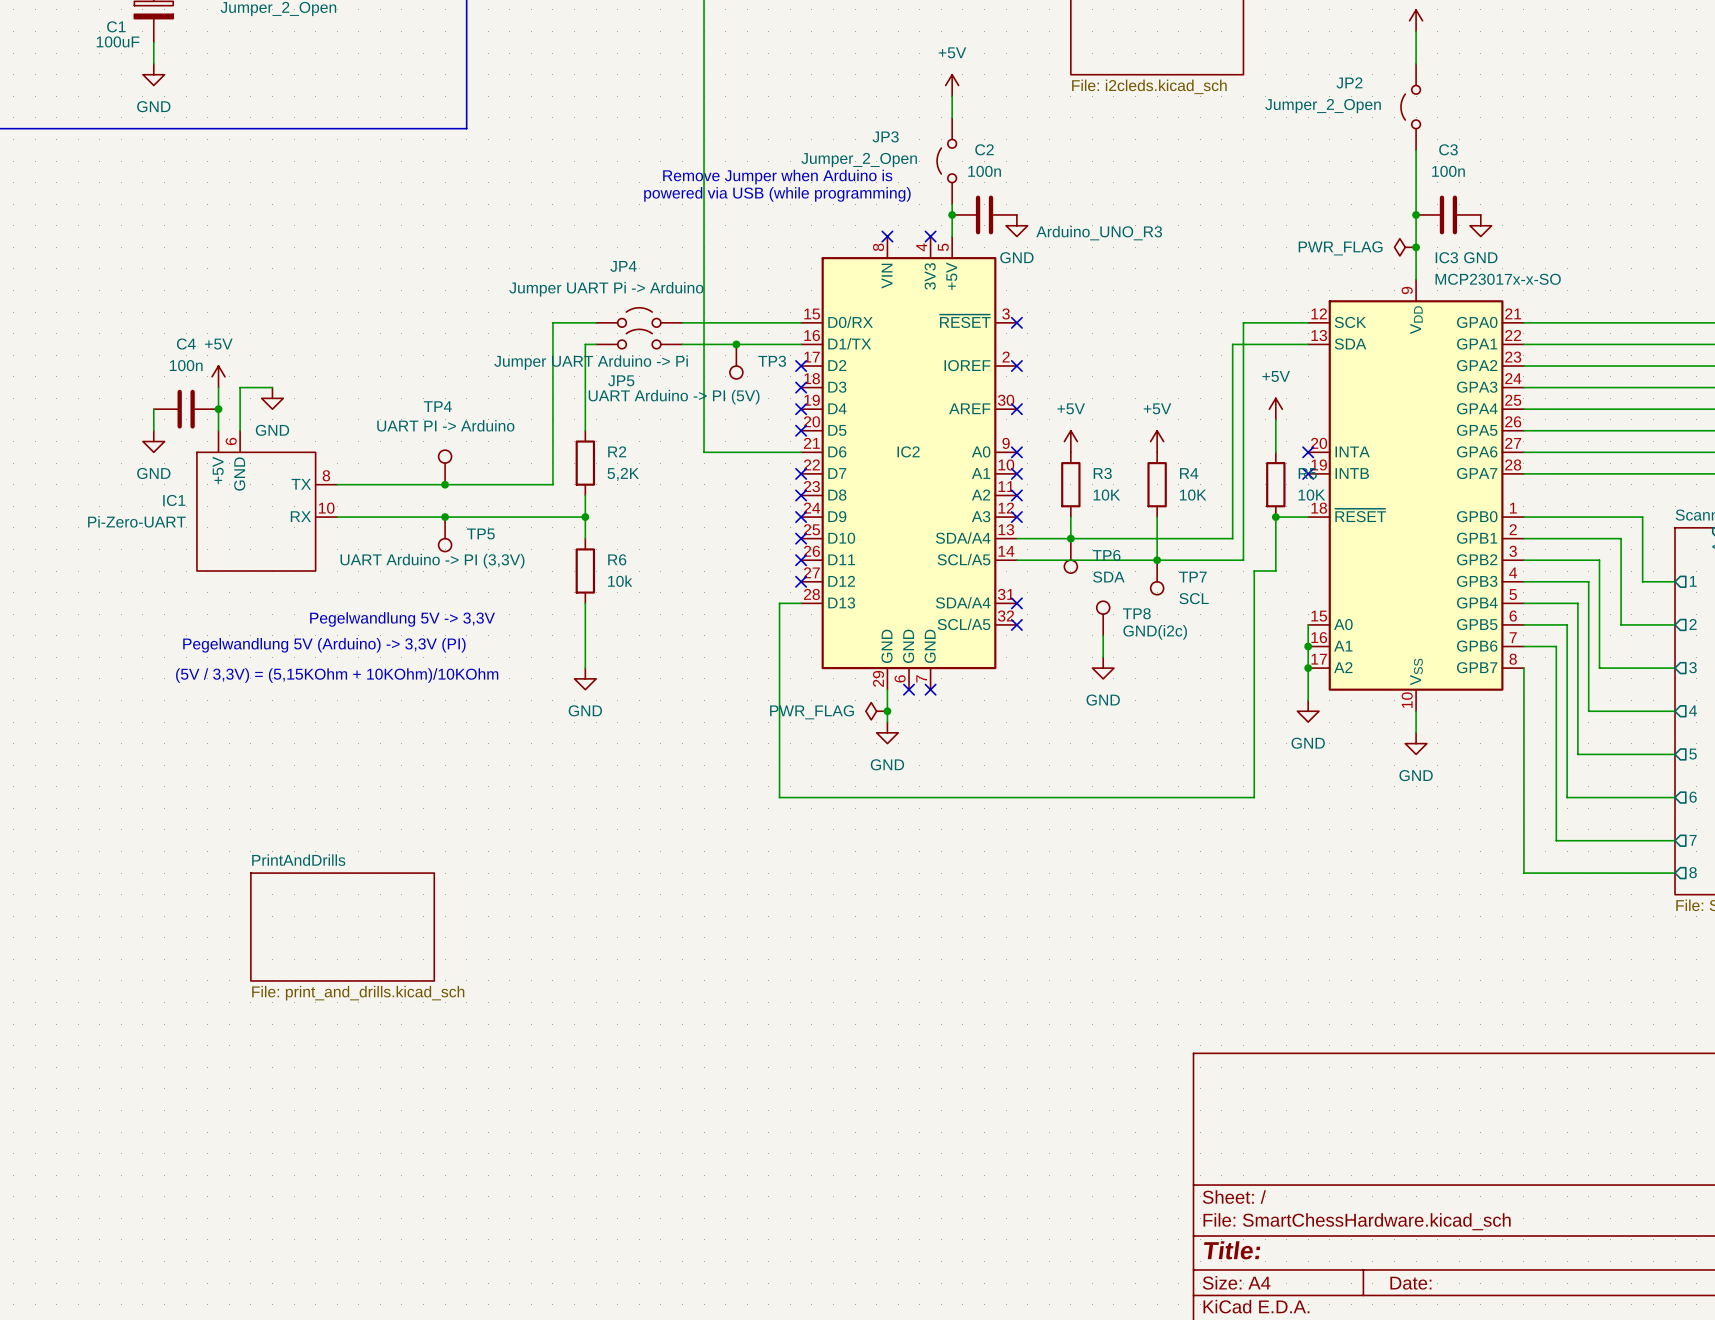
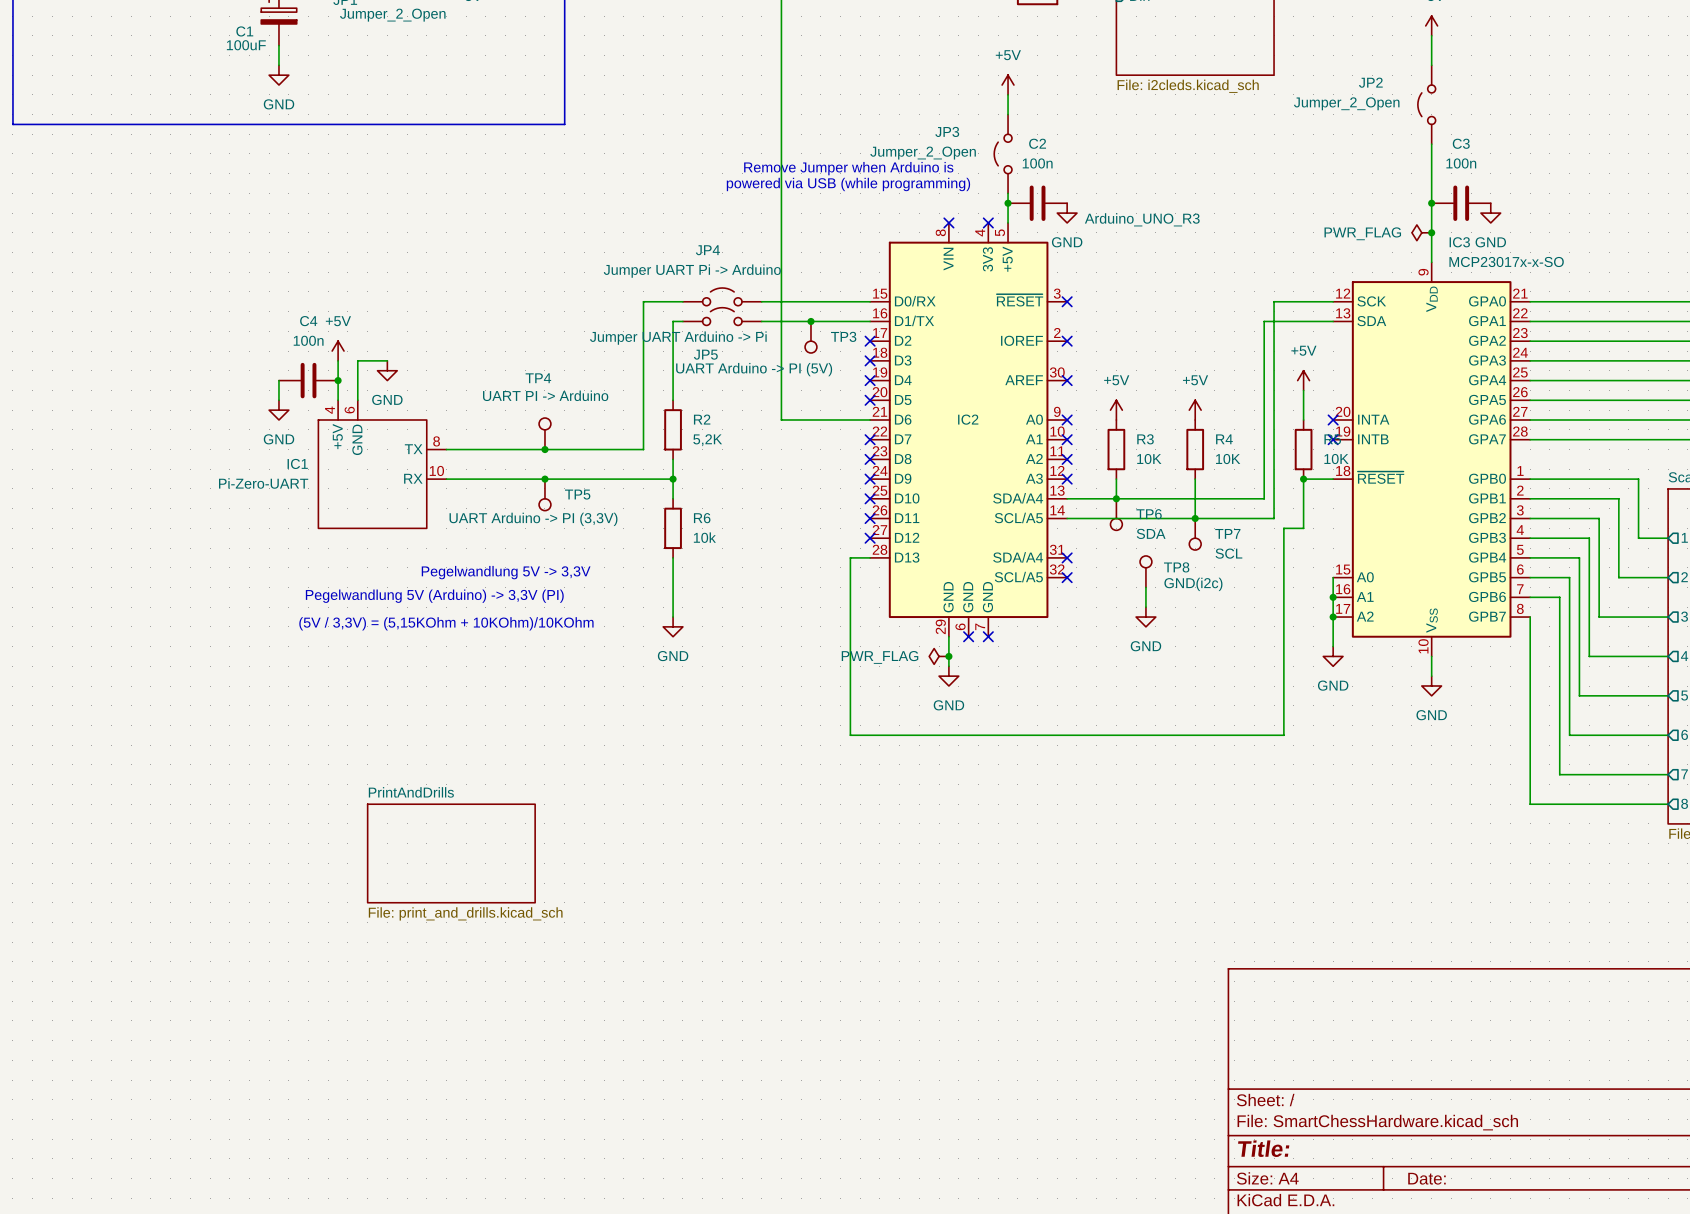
IC1 pin number: none -> 4 (329, 410)

